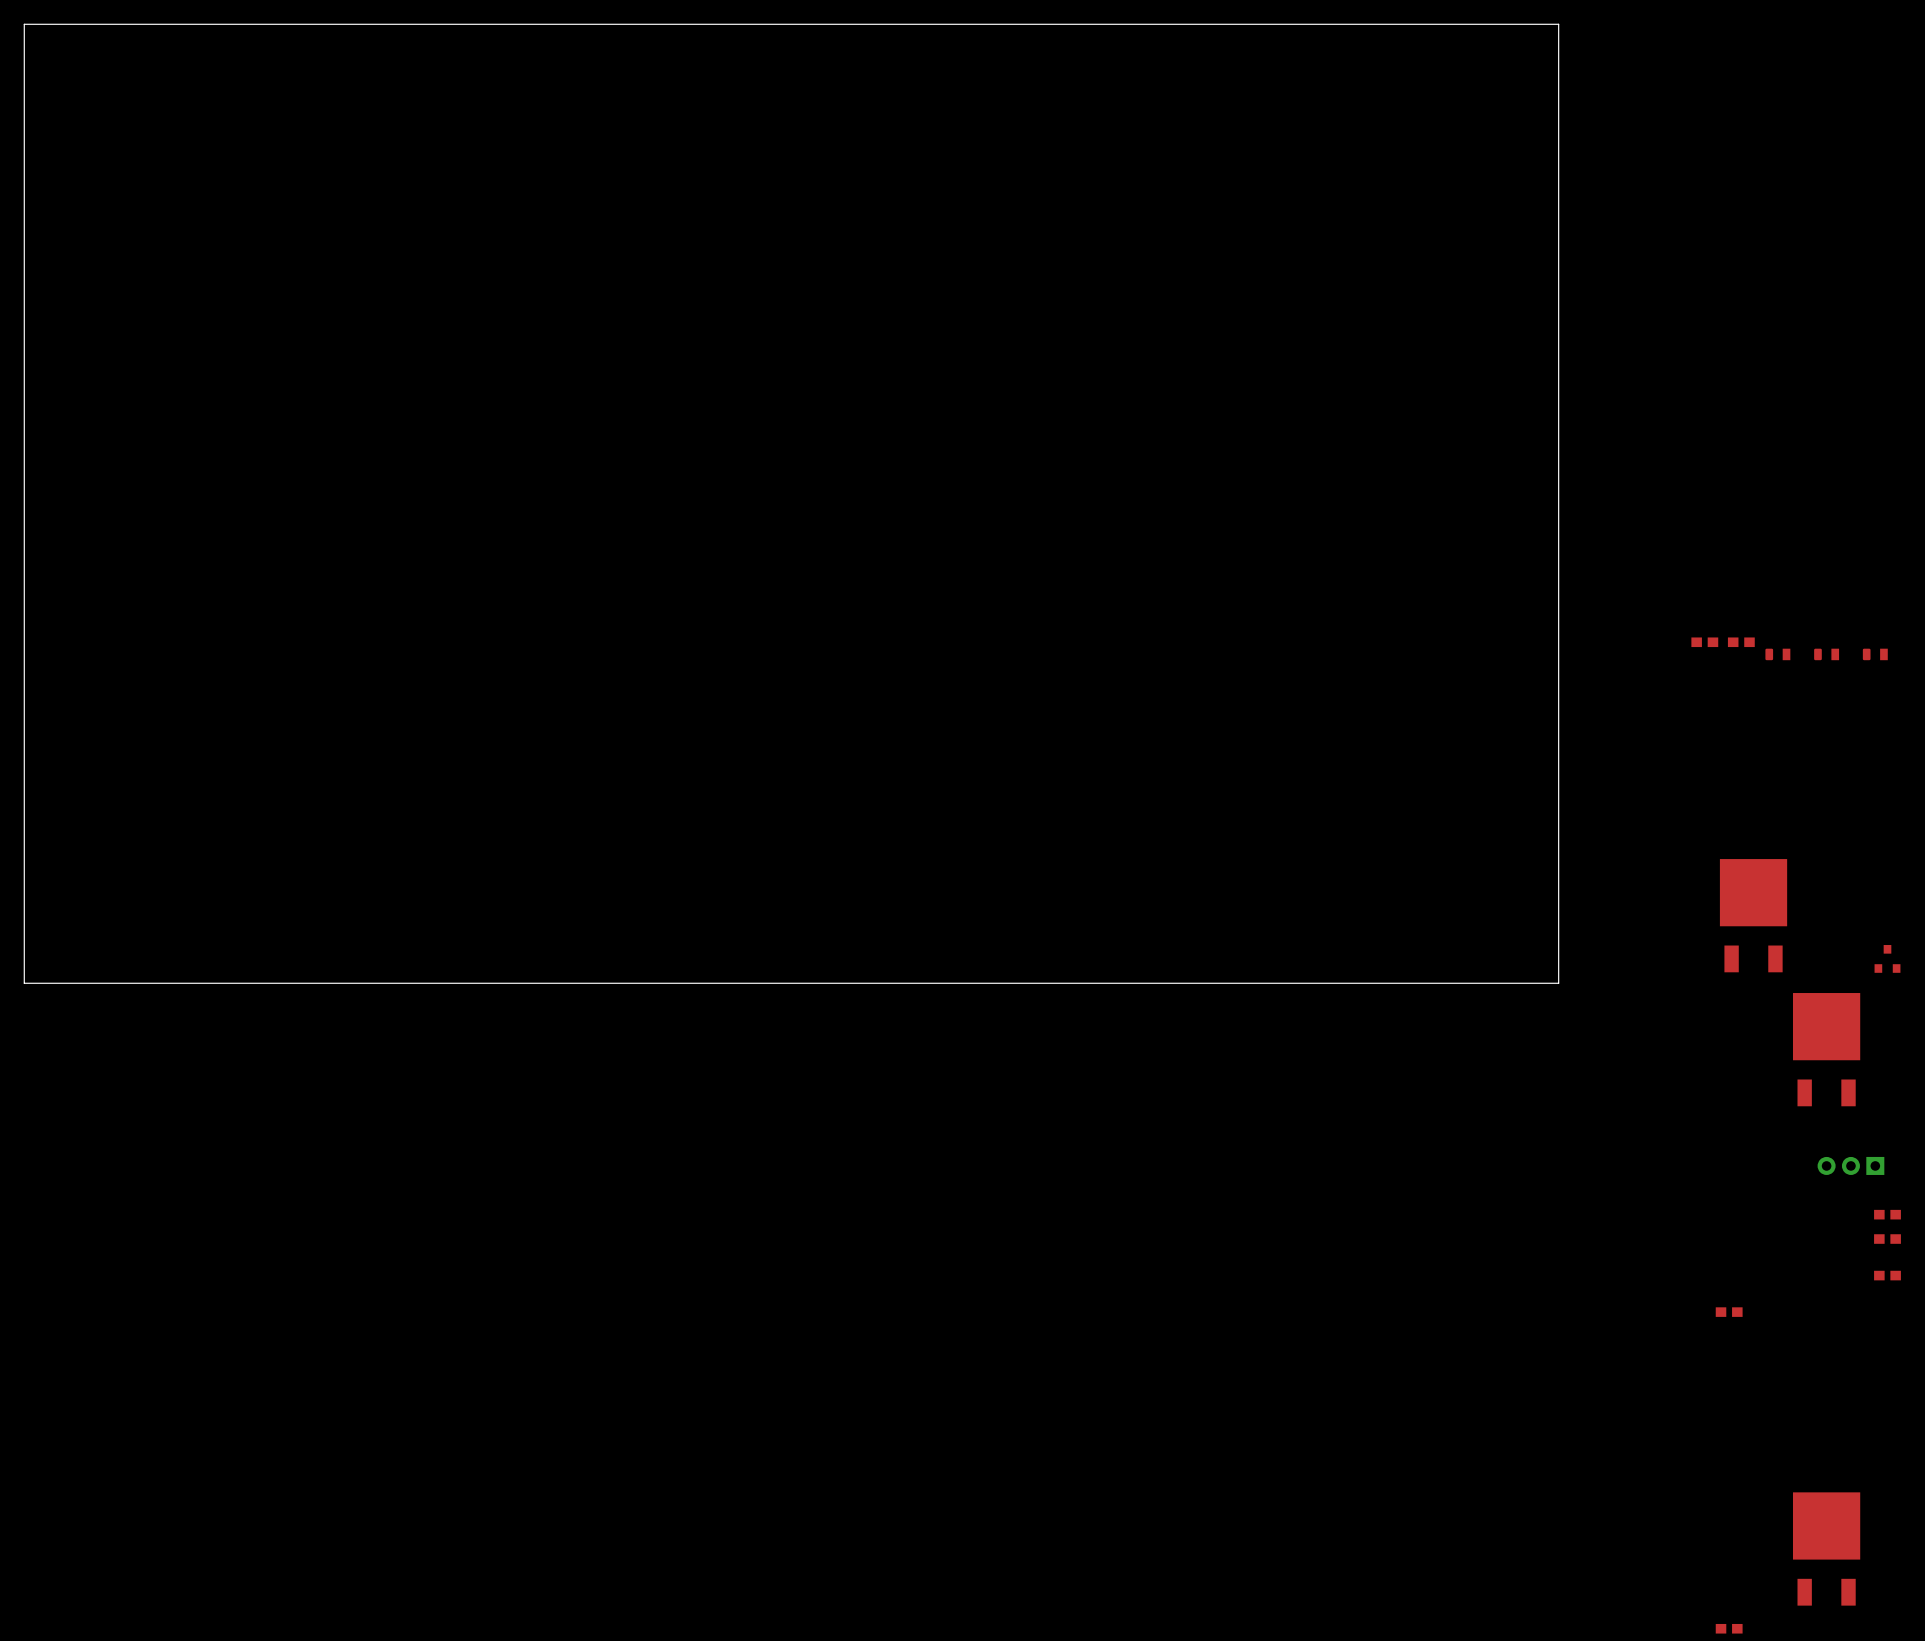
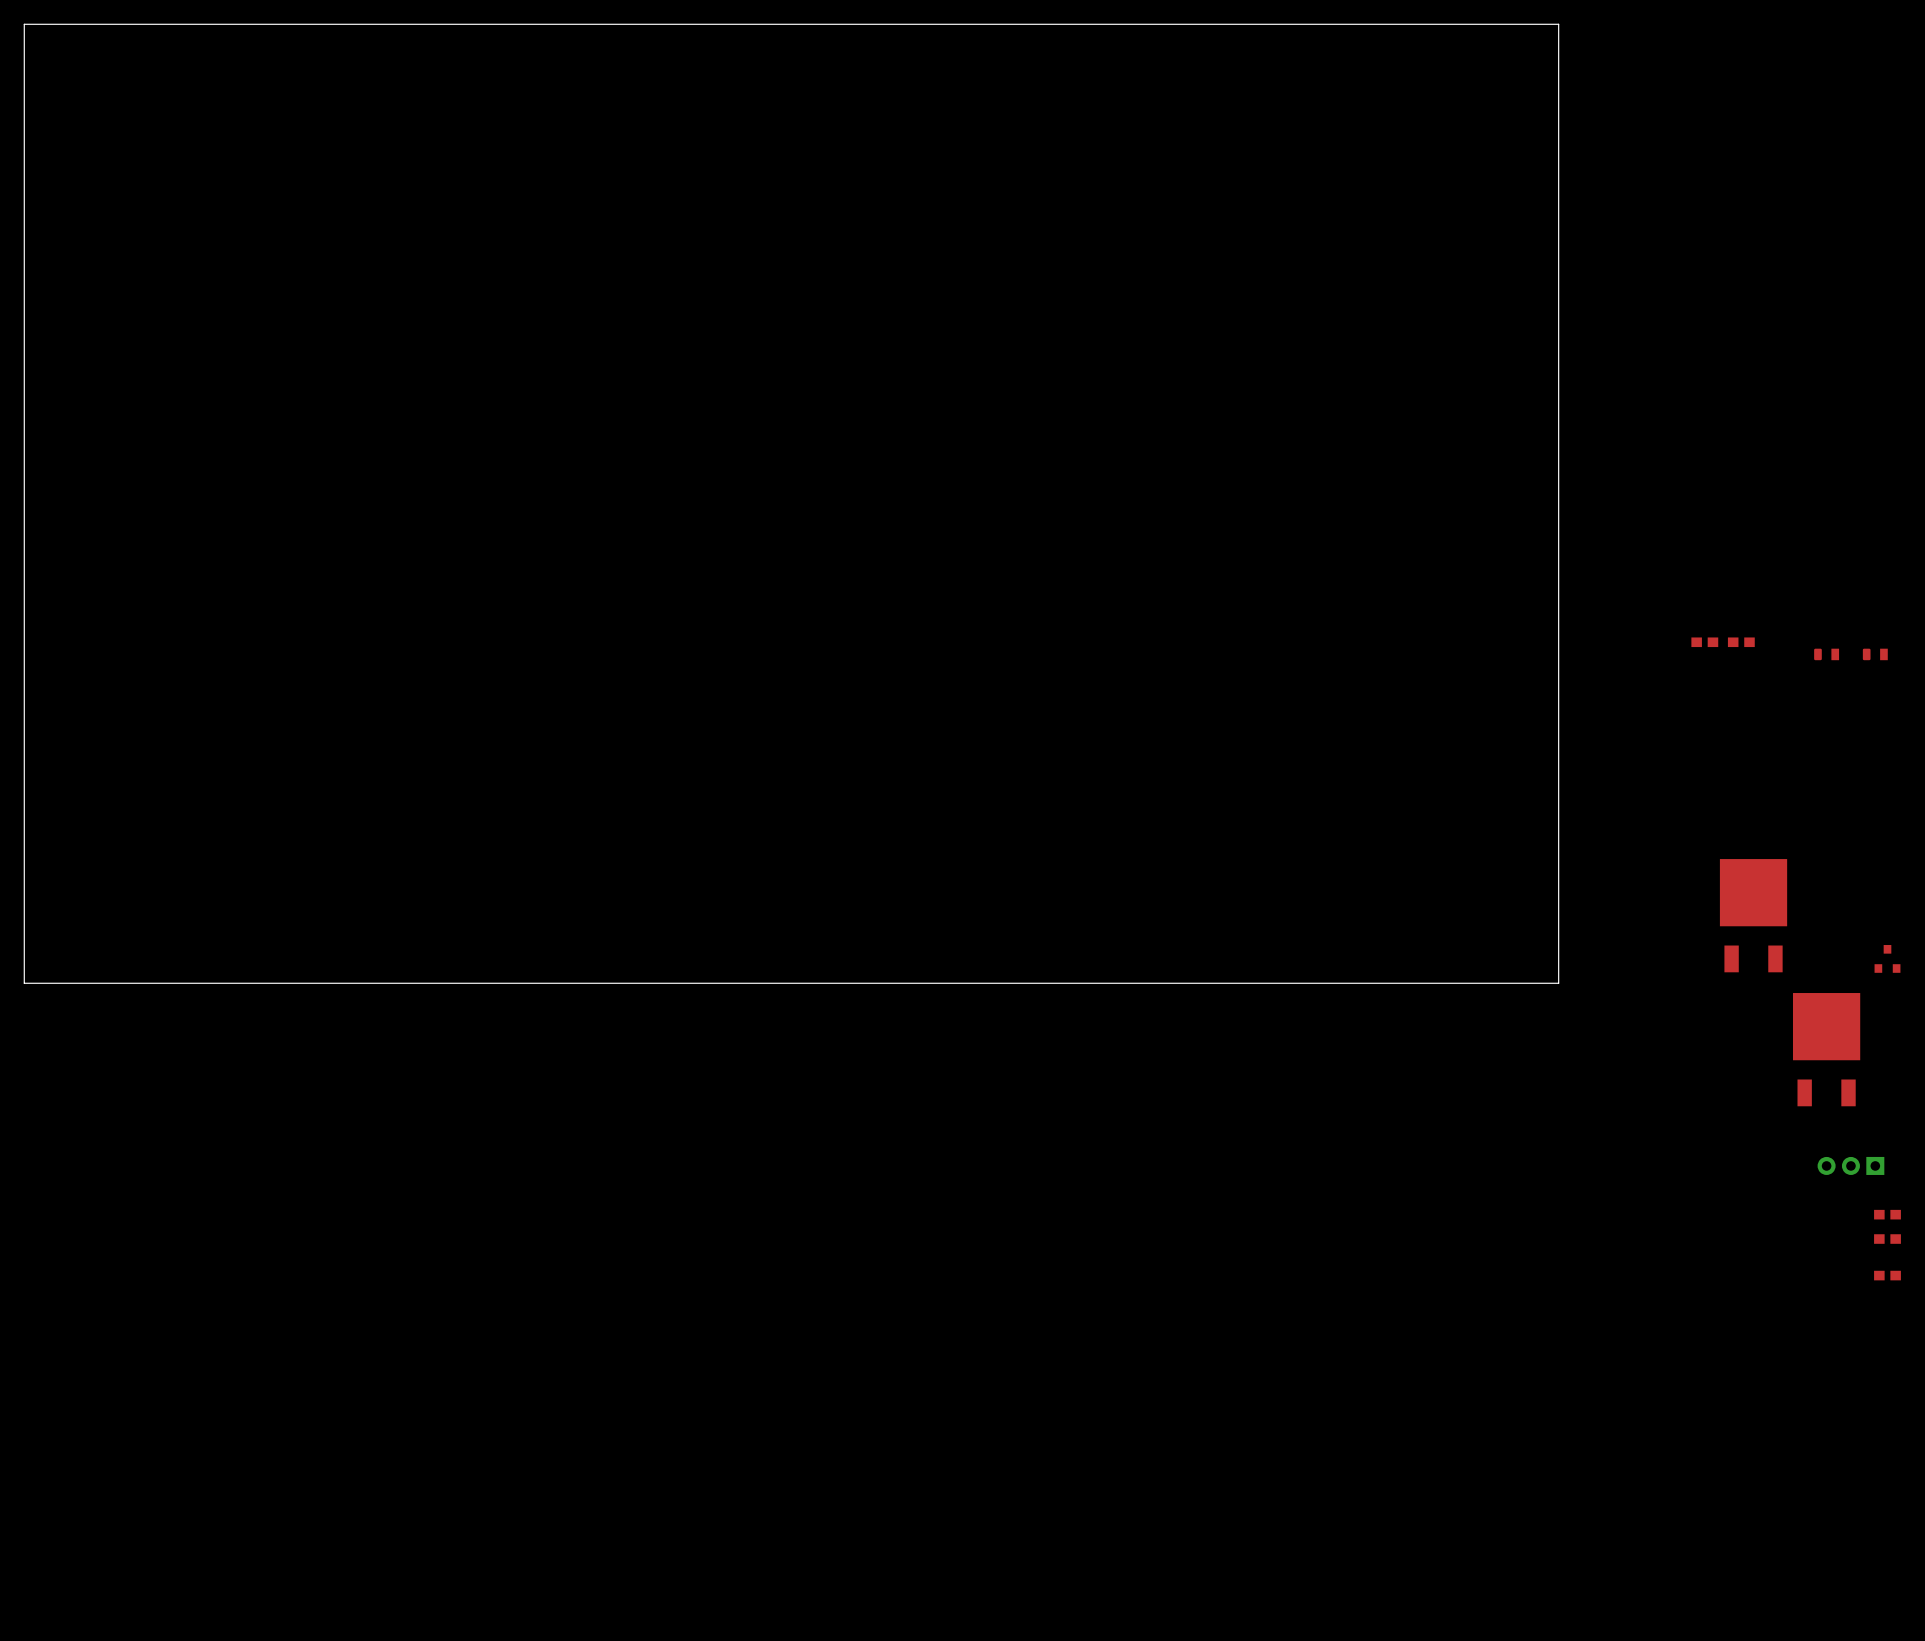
part: (1777, 654) -> none
part: (1729, 1312) -> none
part: (1826, 1548) -> none
part: (1729, 1628) -> none

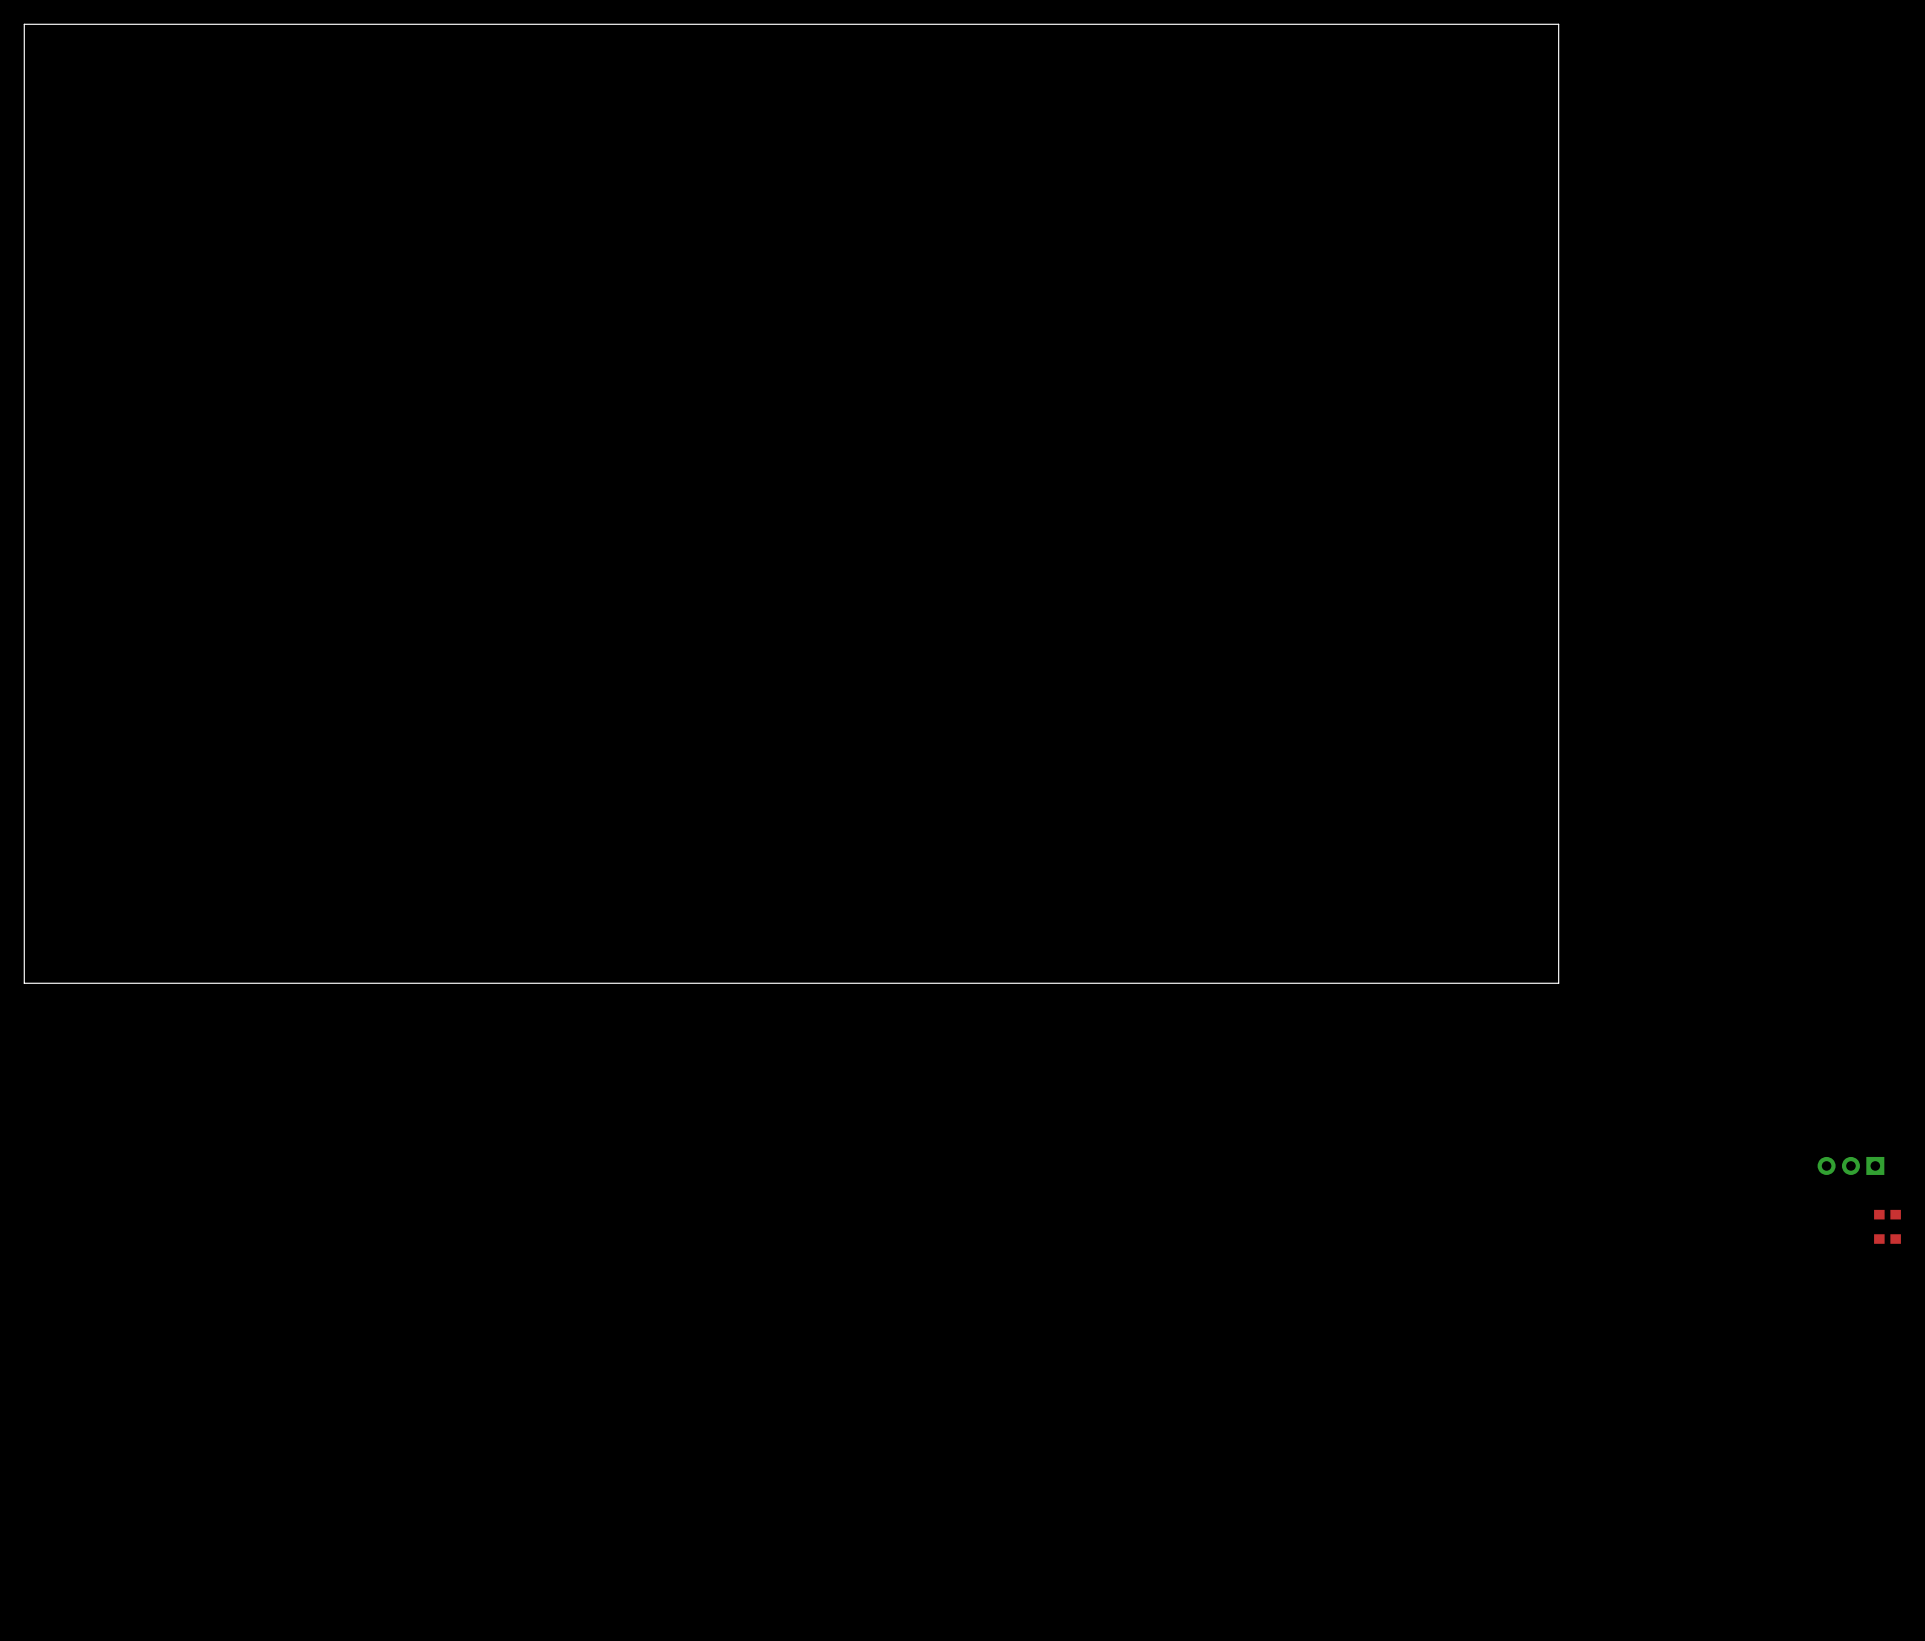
part: (1704, 642) -> none
part: (1741, 642) -> none
part: (1826, 654) -> none
part: (1875, 654) -> none
part: (1753, 915) -> none
part: (1887, 958) -> none
part: (1826, 1049) -> none
part: (1887, 1275) -> none

